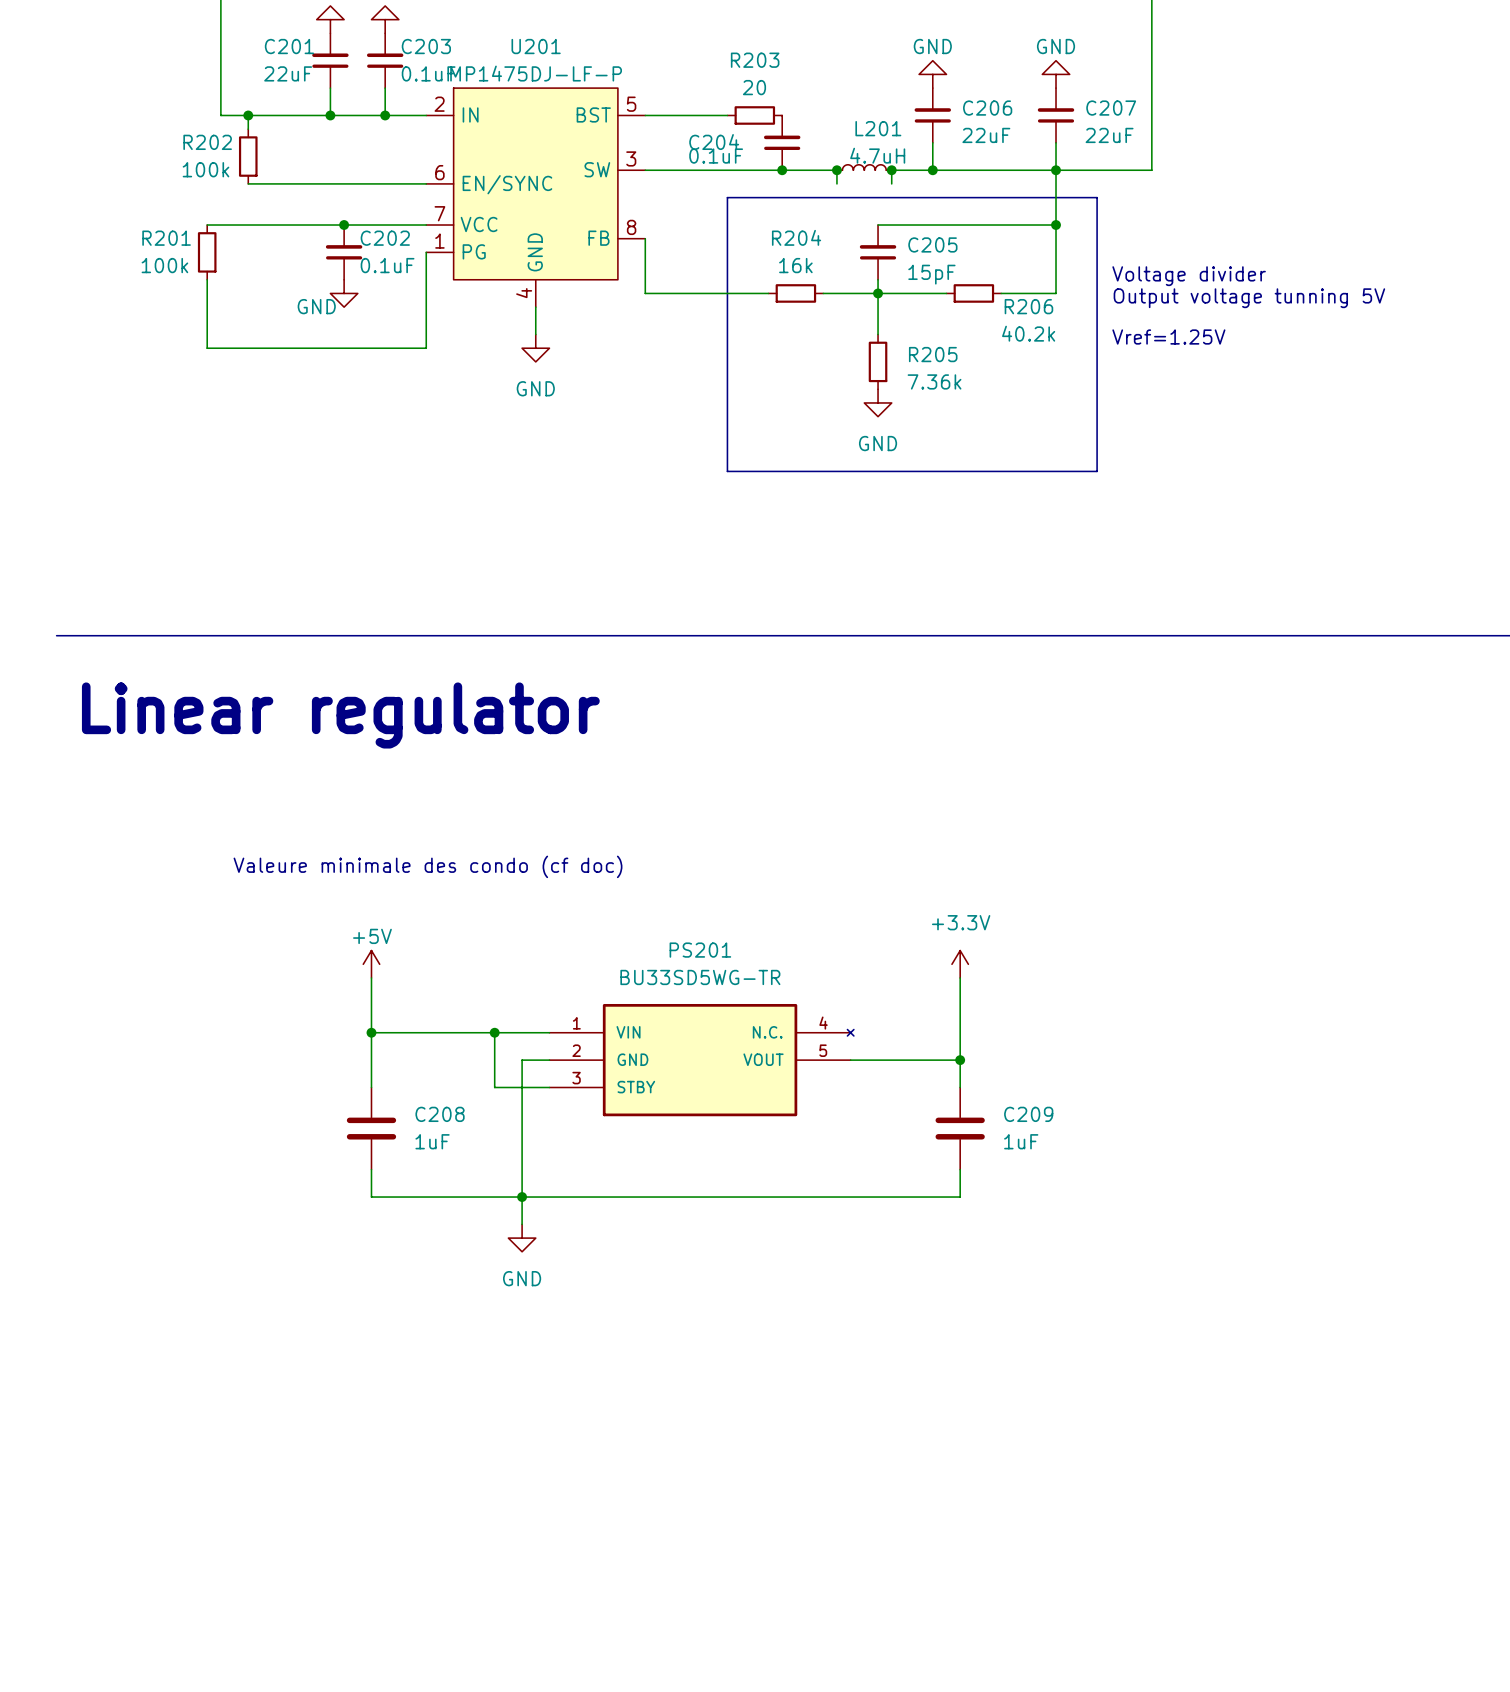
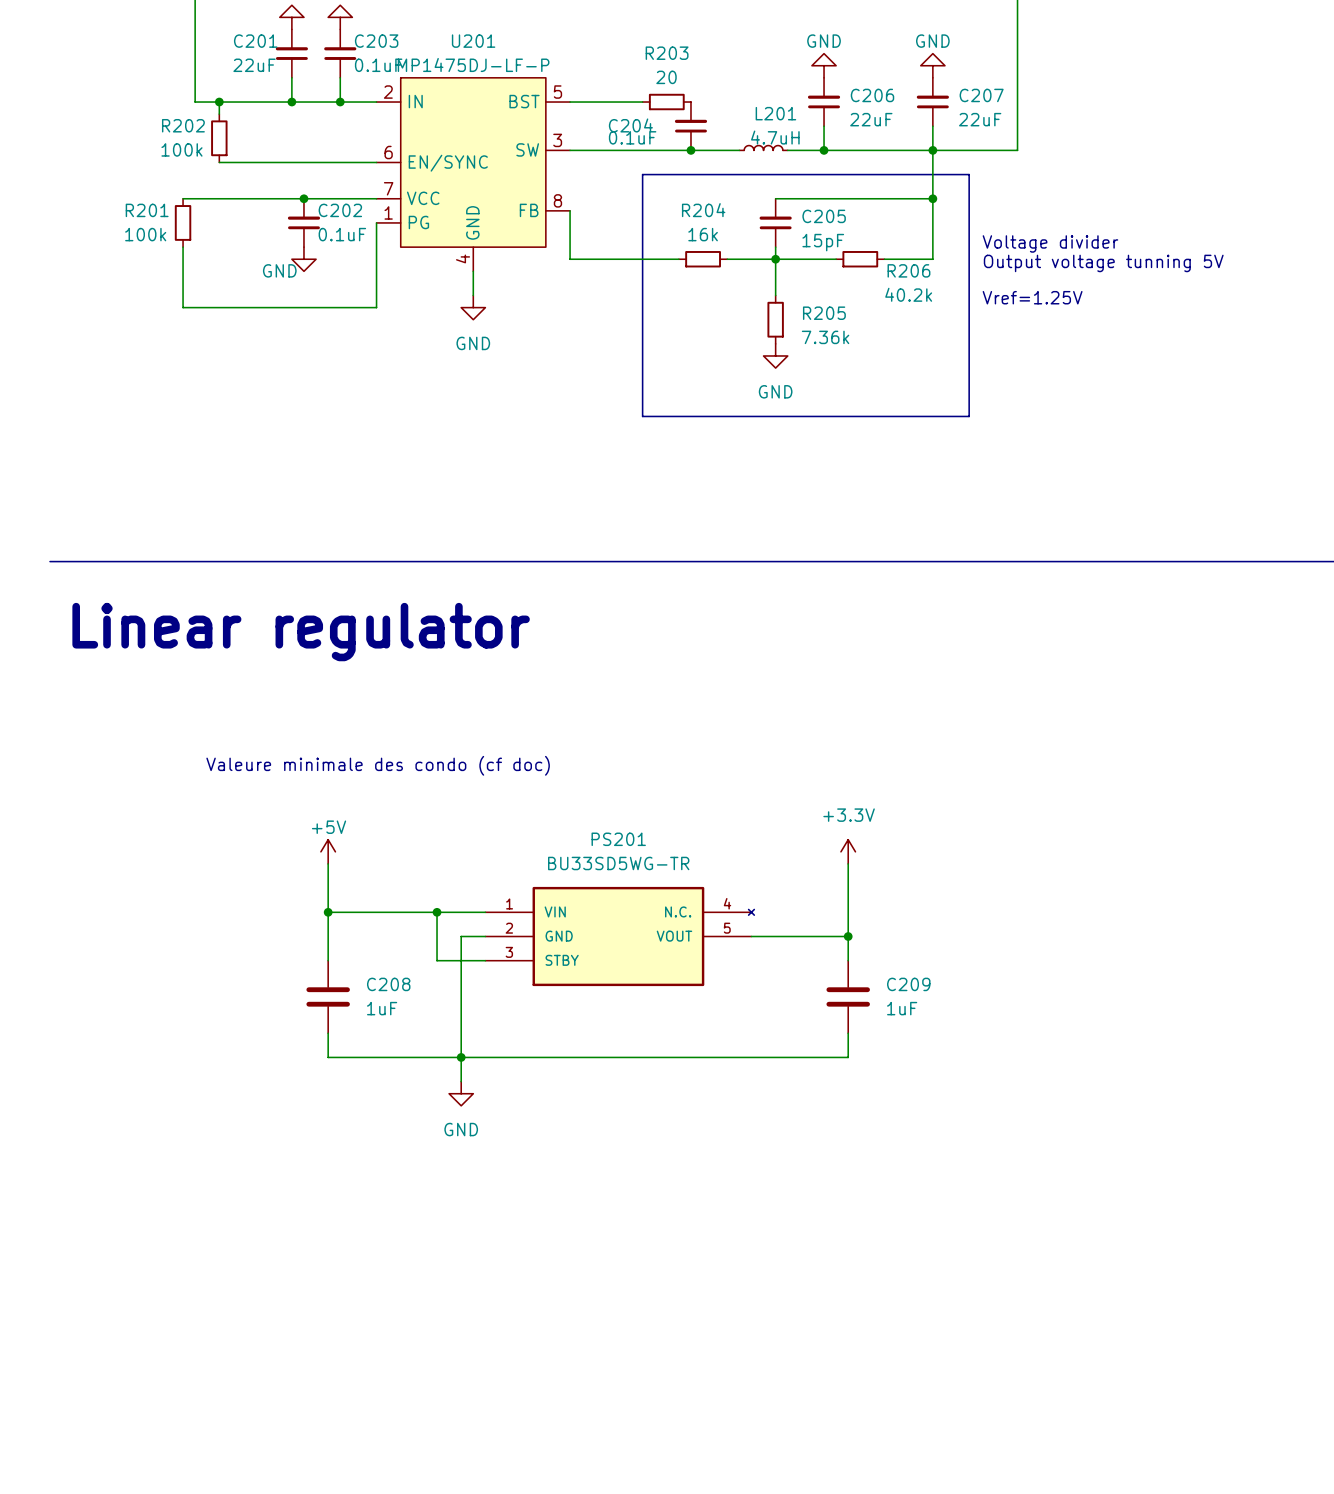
wire: (836, 170) (836, 183) -> none
junction: (836, 170) -> none
wire: (891, 170) (891, 183) -> none
junction: (891, 170) -> none

